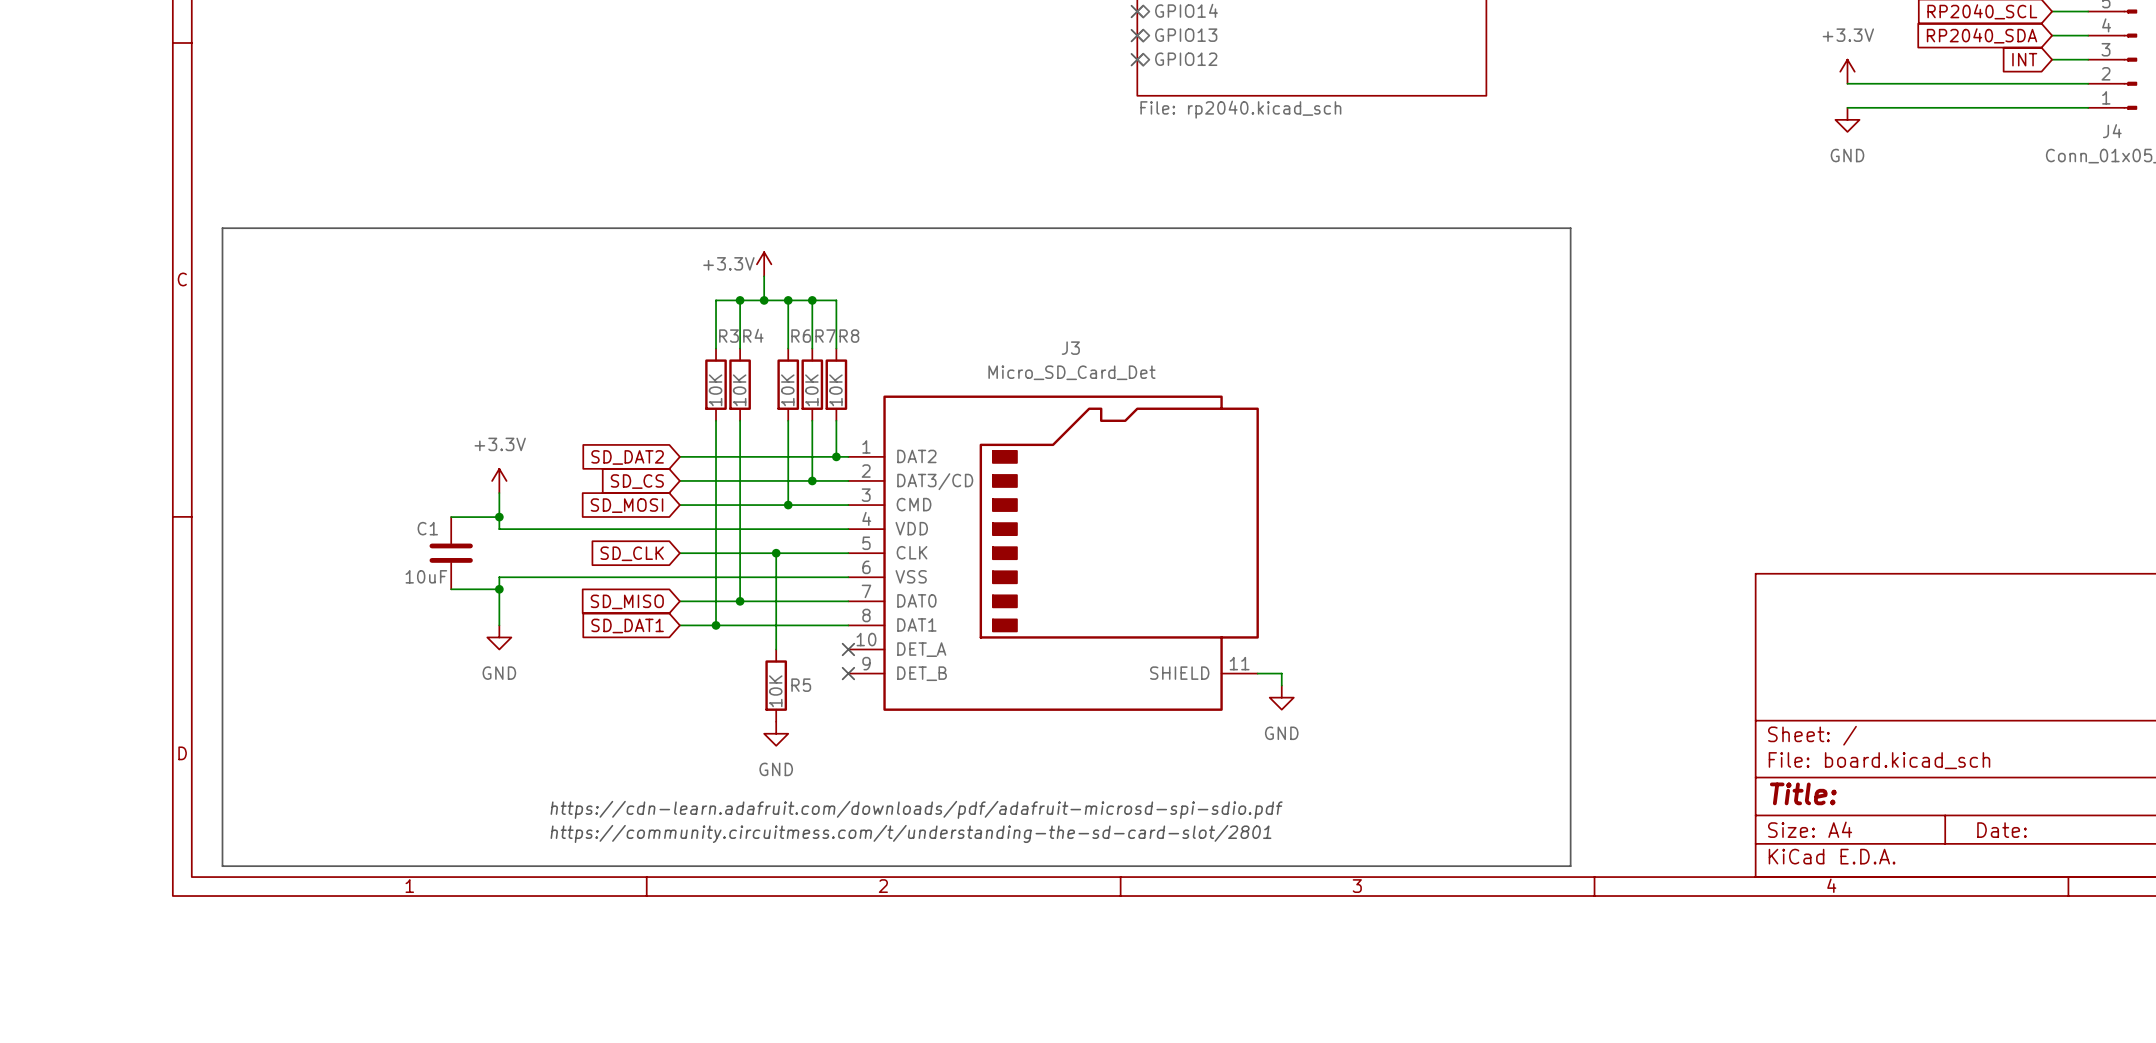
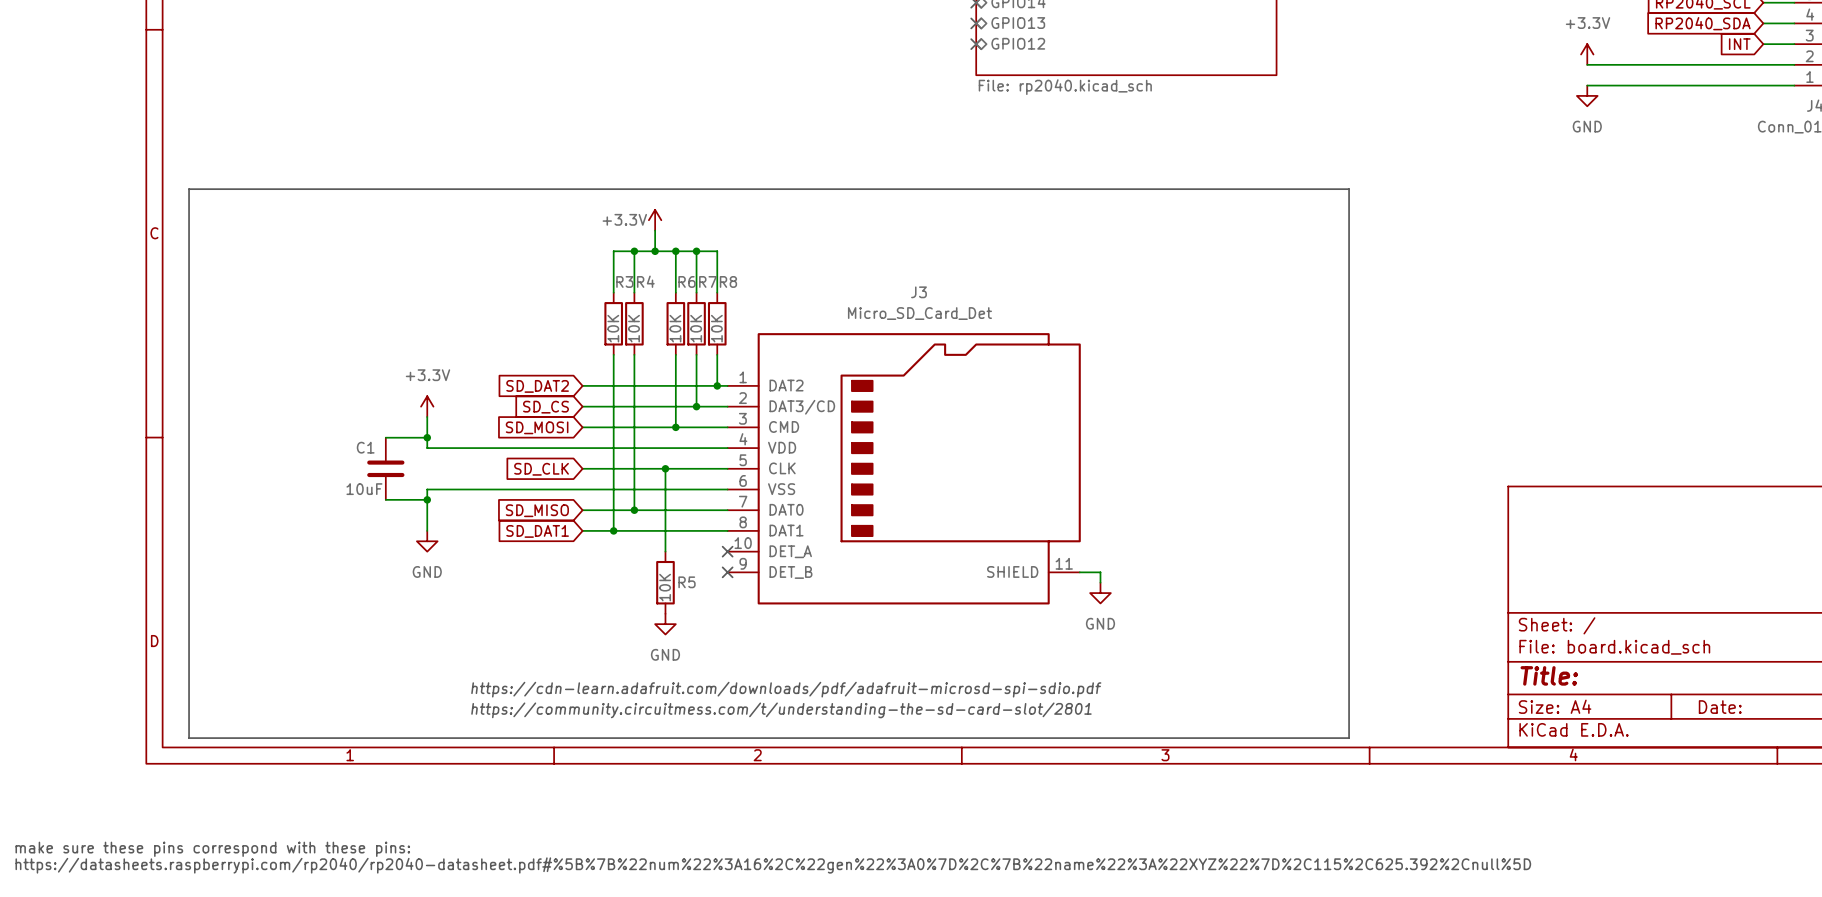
text: none -> make sure these pins correspond with these pins: (212, 849)
text: none -> https://datasheets.raspberrypi.com/rp2040/rp2040-datasheet.pdf#%5B%7B%22num%22%3A16%2C%22gen%22%3A0%7D%2C%7B%22name%22%3A%22XYZ%22%7D%2C115%2C625.392%2Cnull%5D (773, 865)

